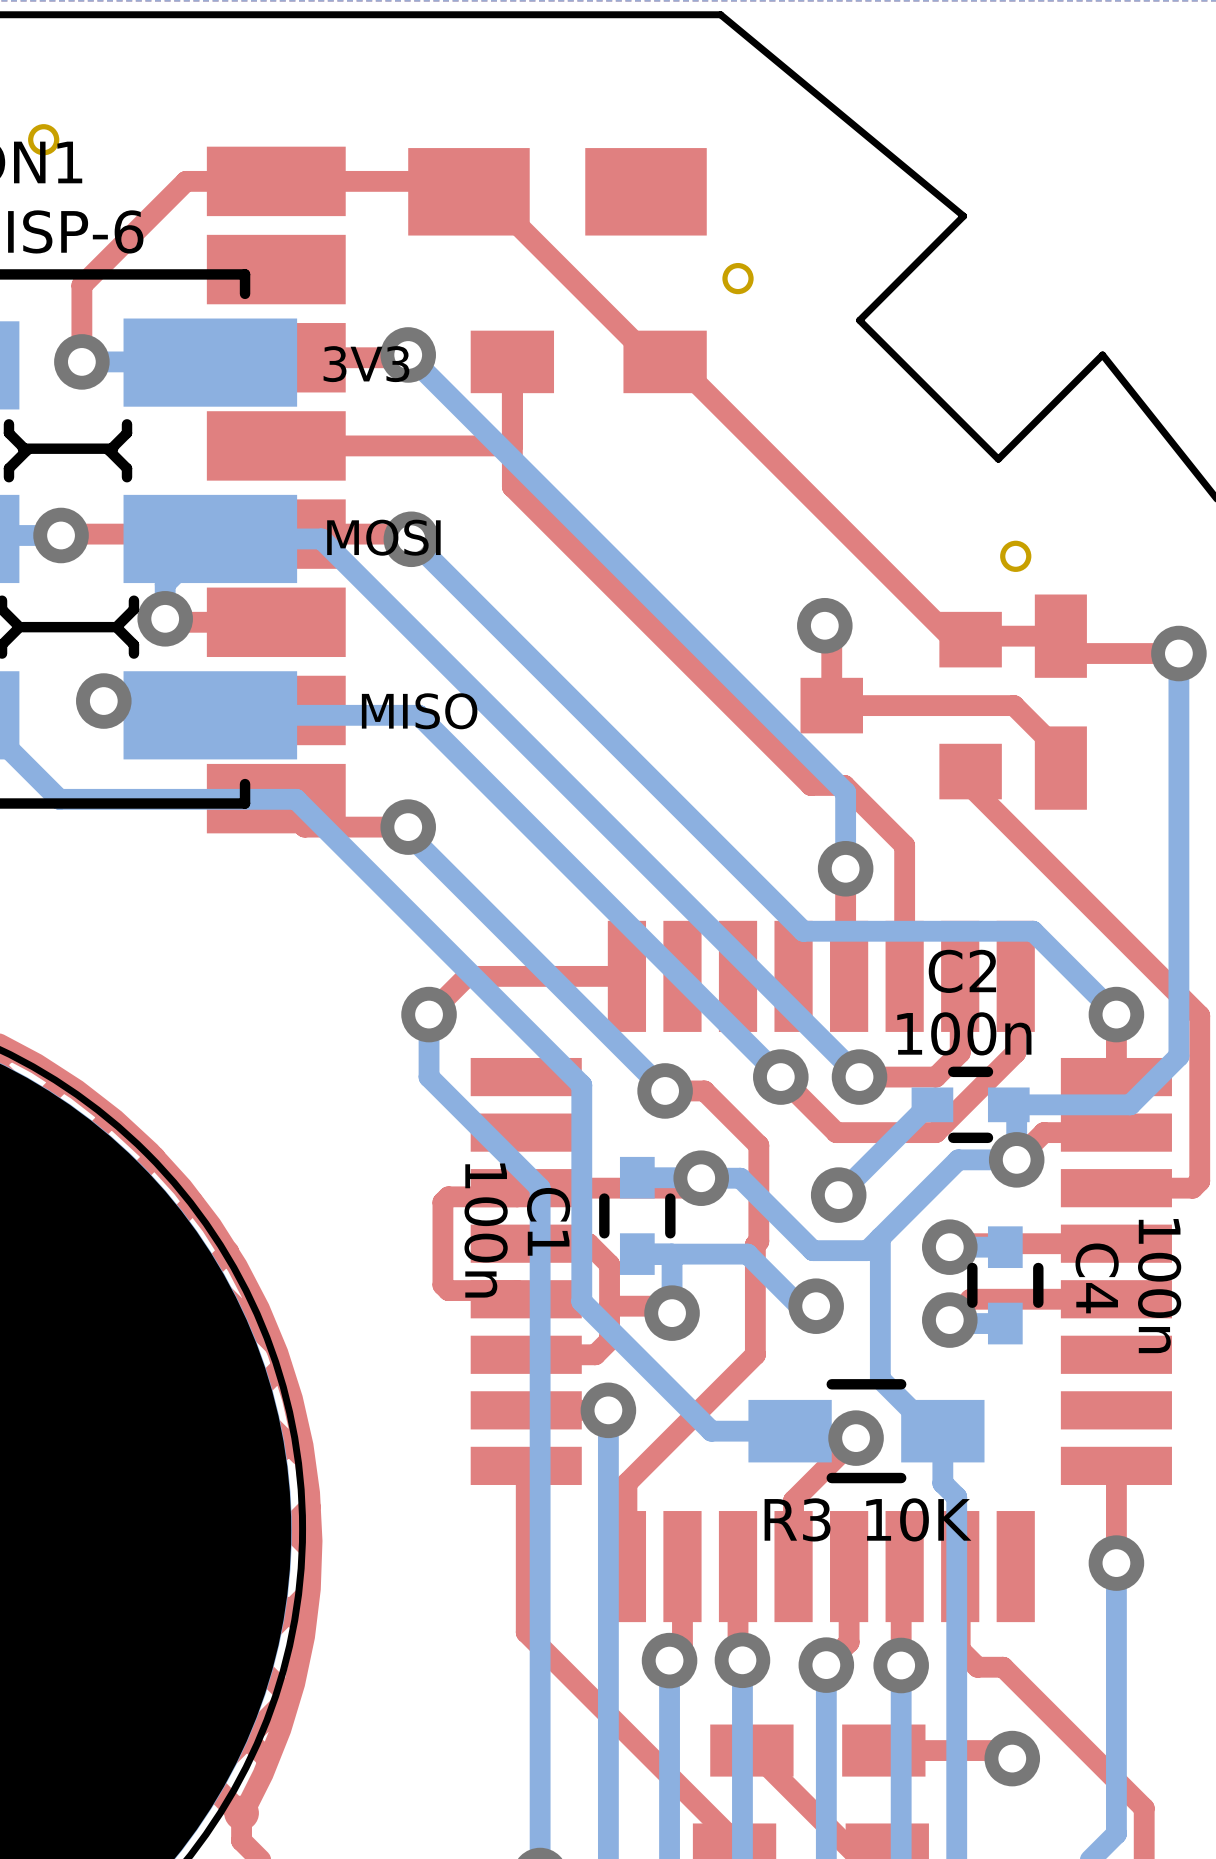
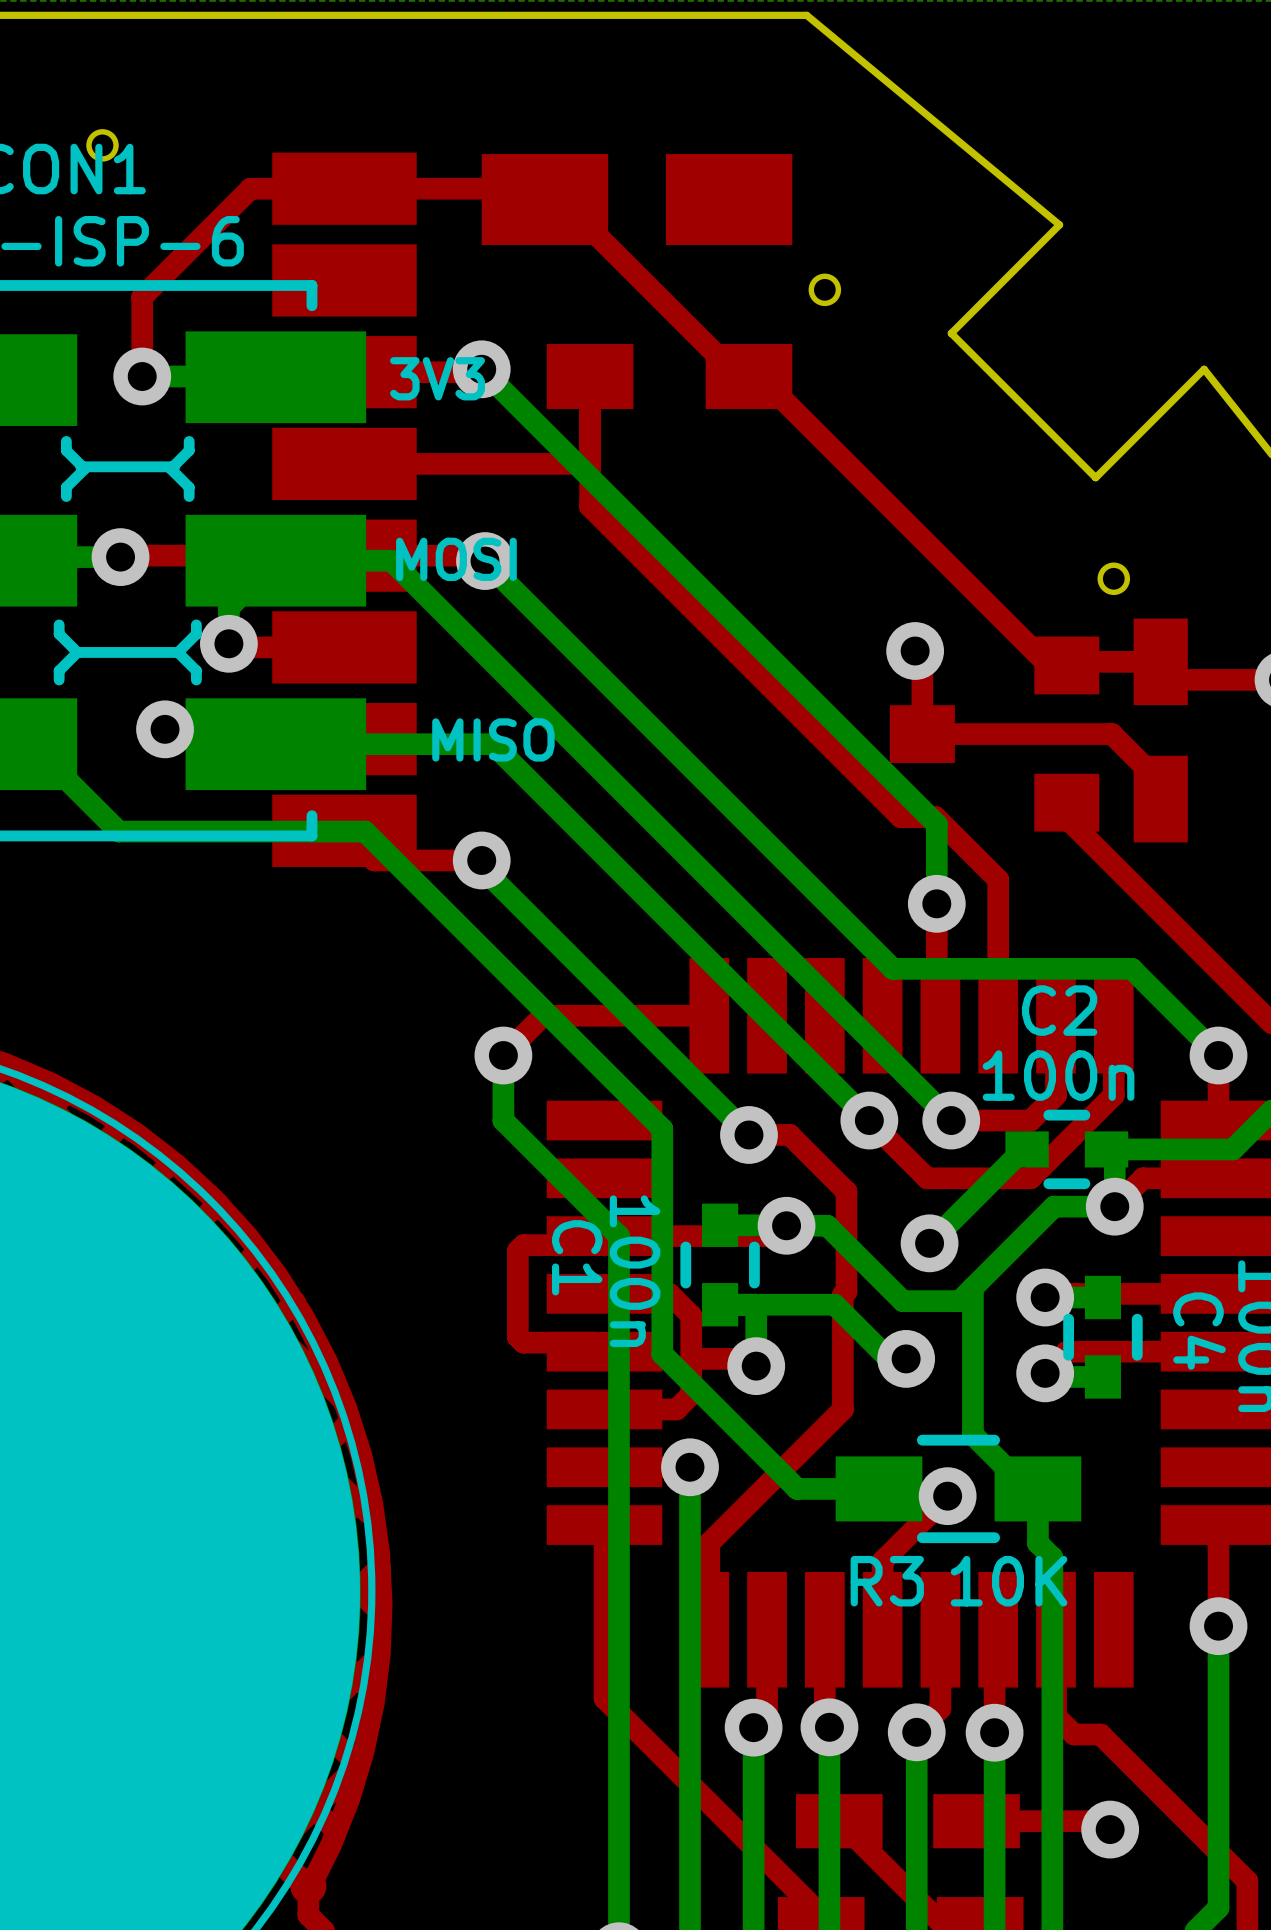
C1 name position: C1 (548, 1221) -> C1 (577, 1257)
C1 value position: 100n (486, 1230) -> 100n (635, 1271)

